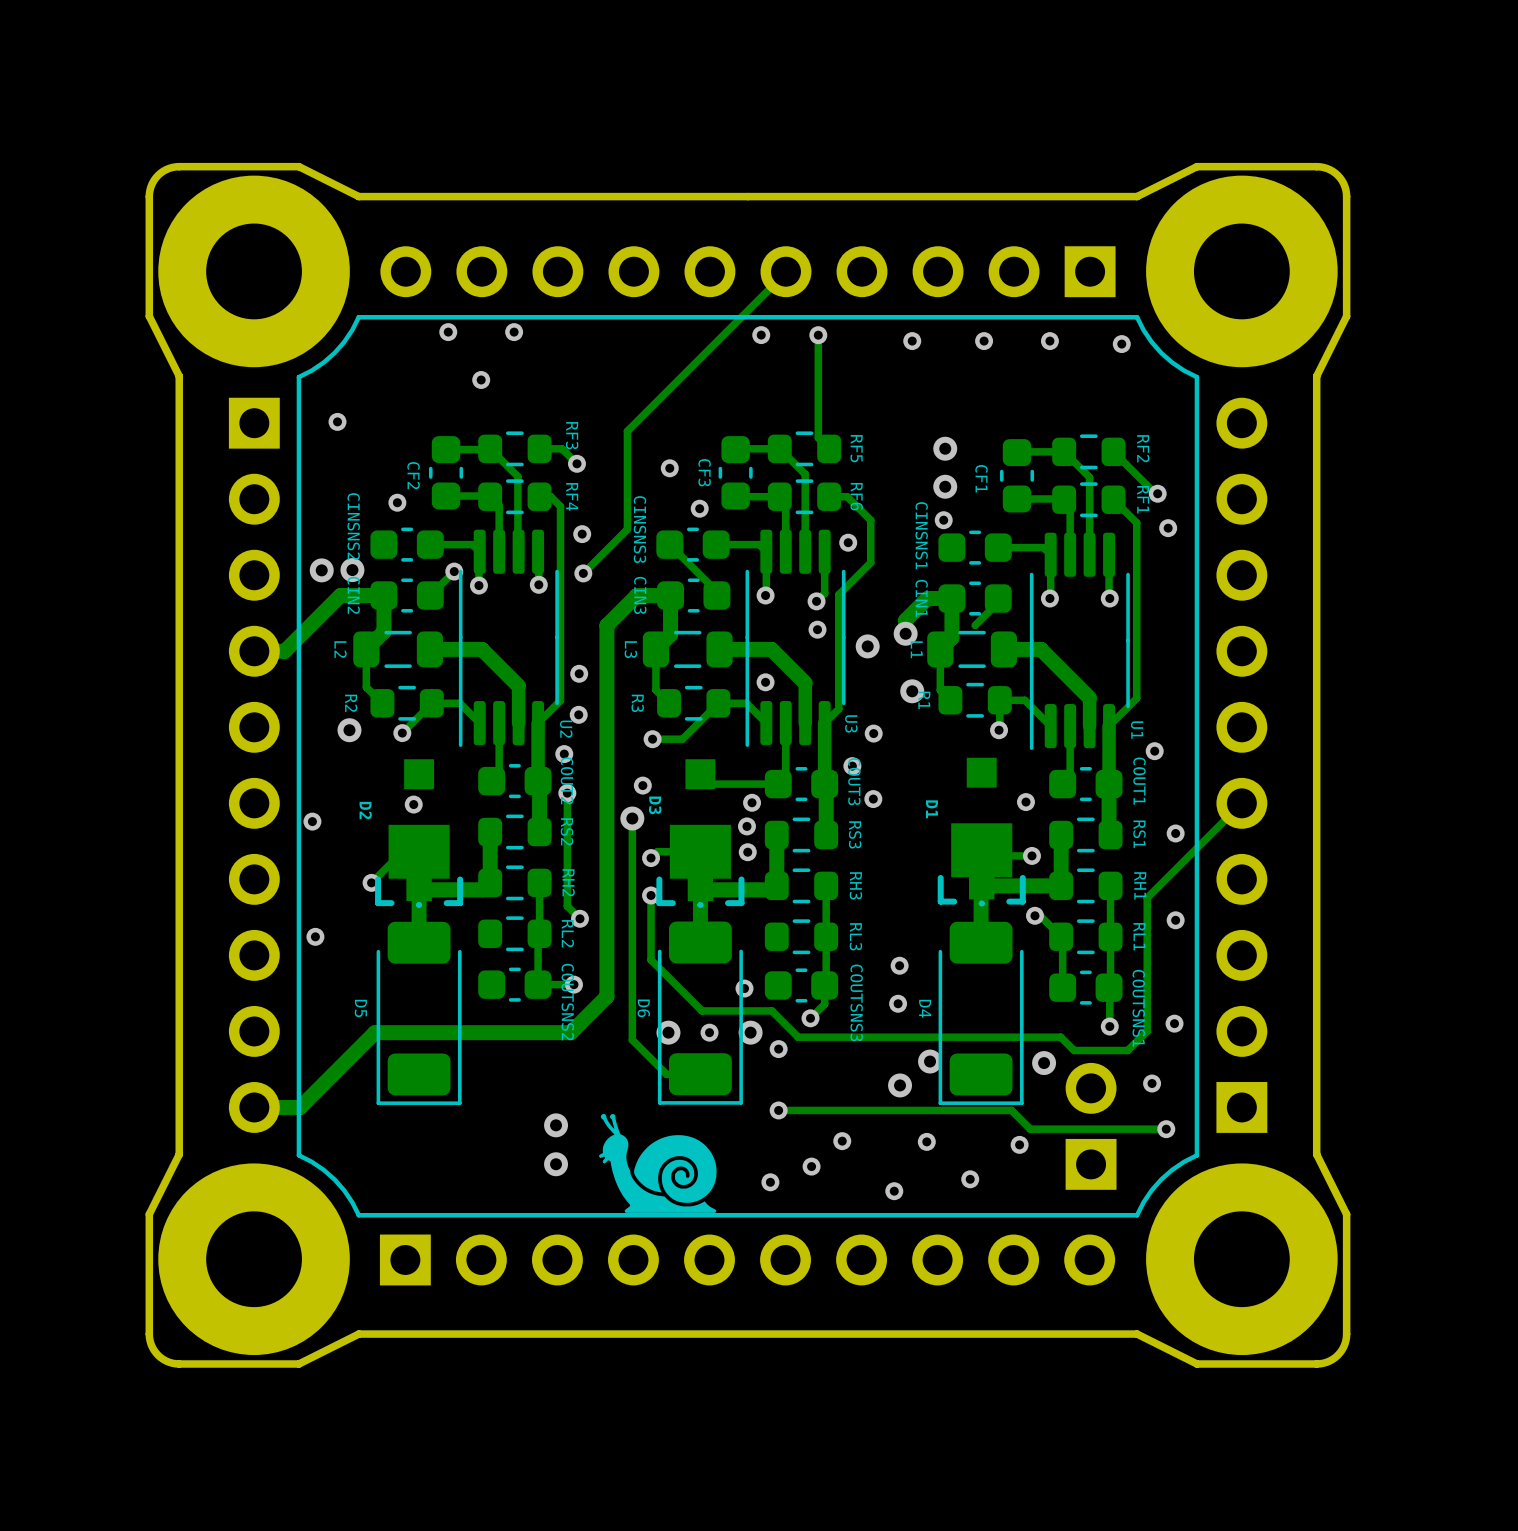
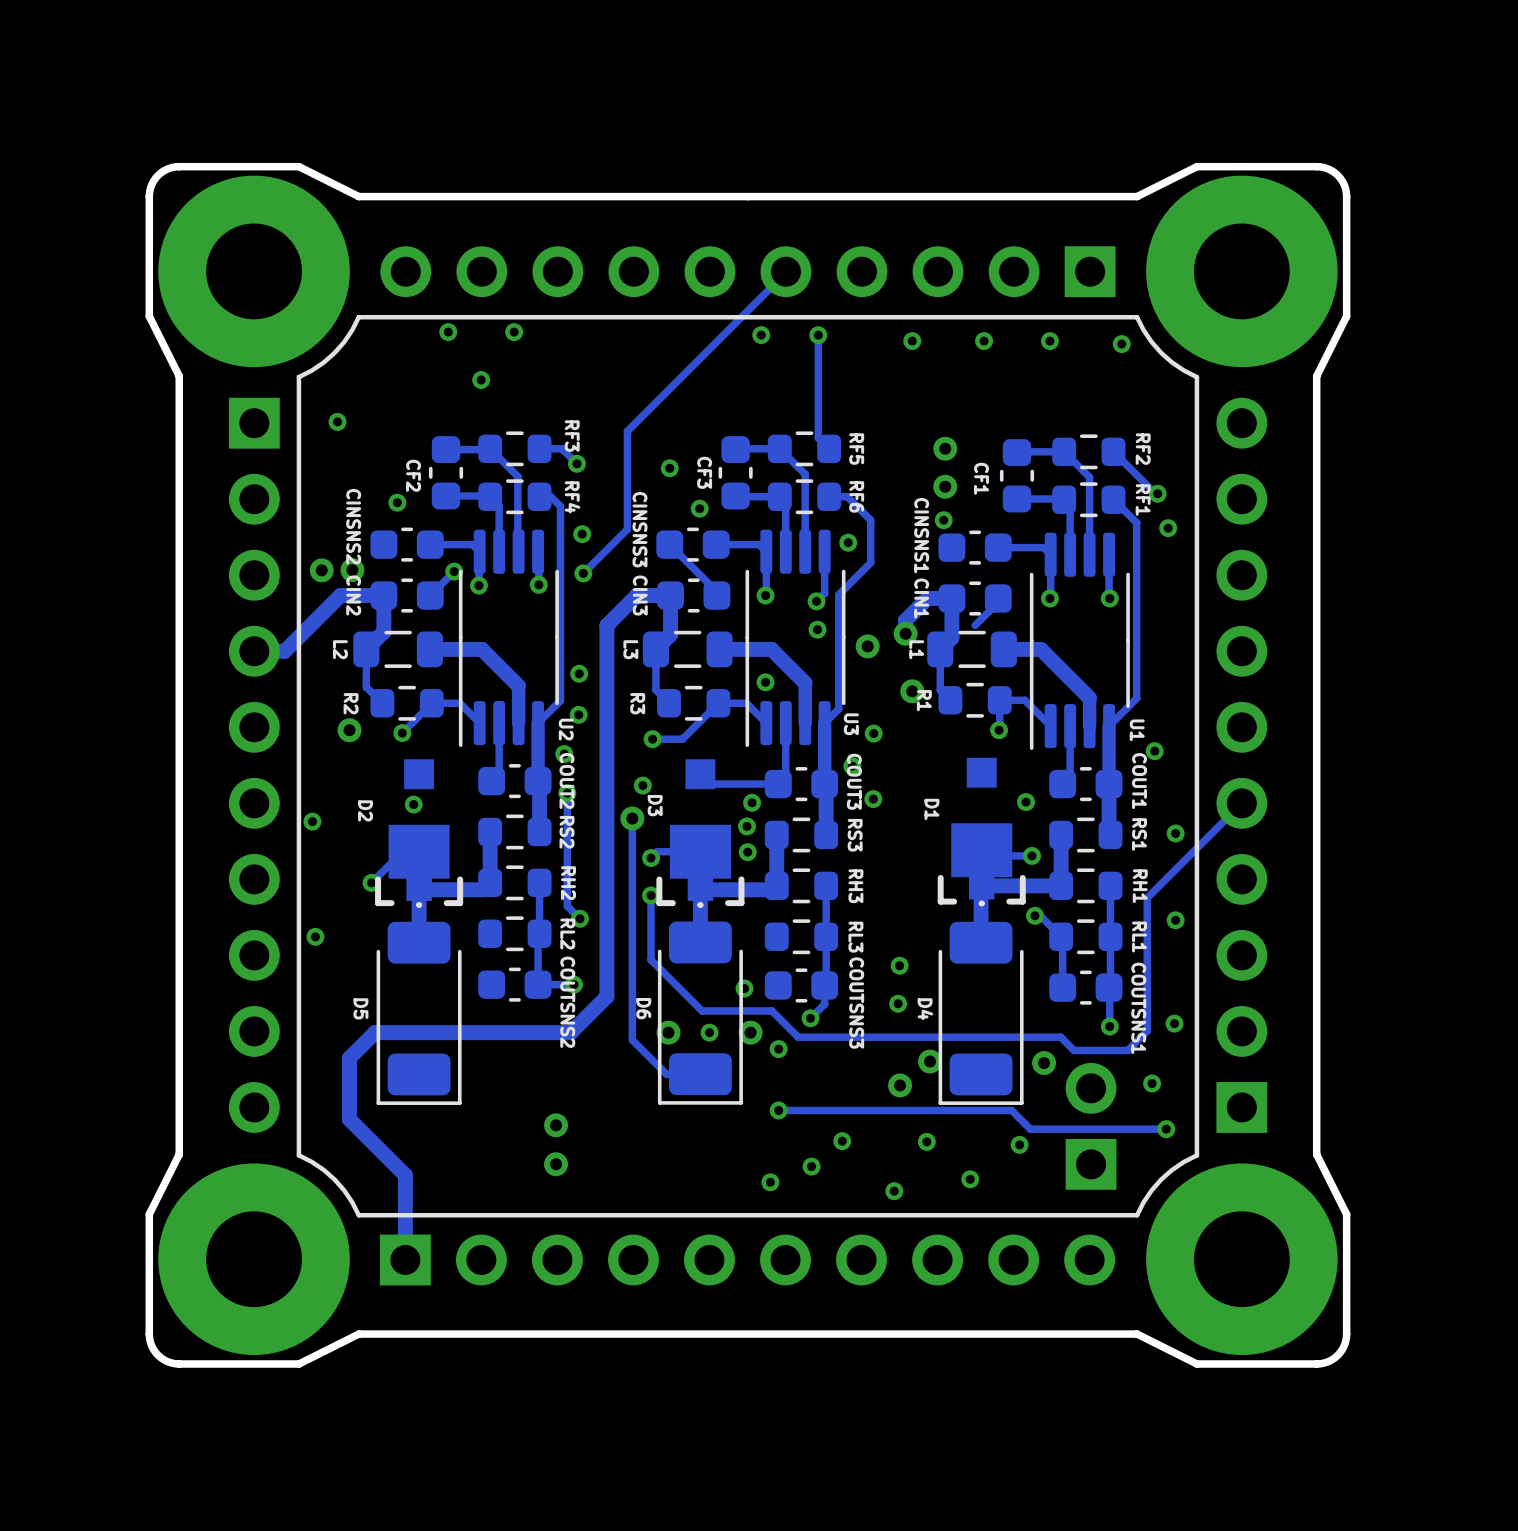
track: (349, 1058) (300, 1107) (254, 1107) -> (349, 1058) (349, 1119) (405, 1175) (405, 1259)
drawing: [599, 1113, 717, 1213] -> none

